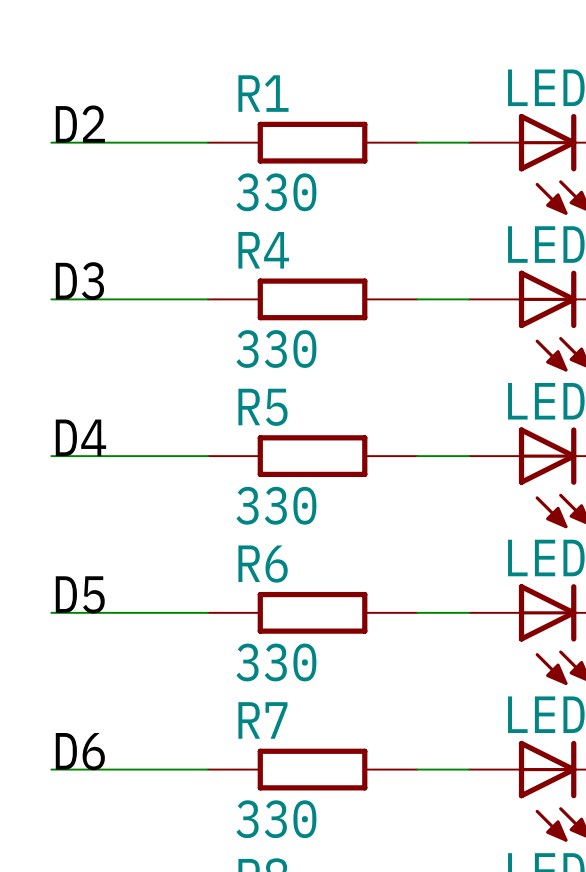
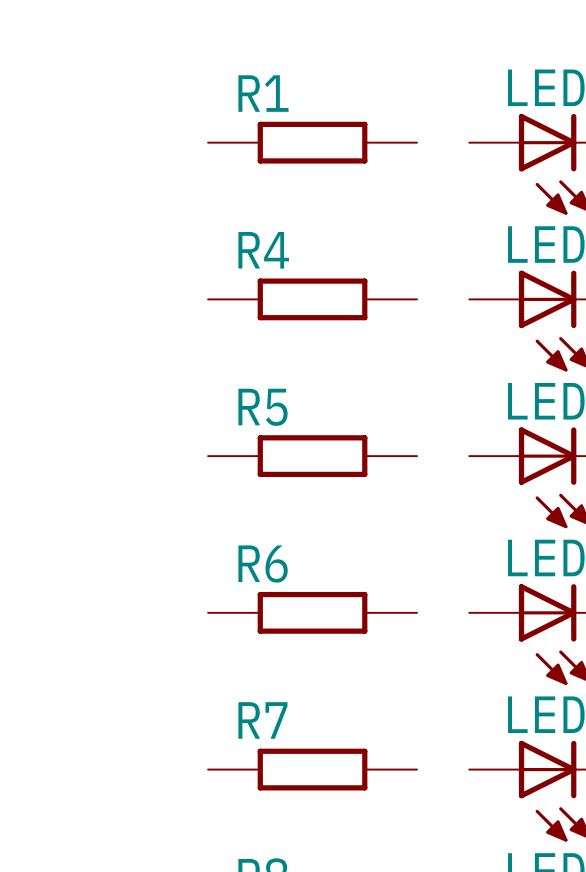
label: D2 (80, 124) -> none
wire: (51, 142) (208, 142) -> none
wire: (417, 142) (469, 142) -> none
R1 value: 330 (276, 192) -> none
label: D3 (79, 281) -> none
wire: (51, 299) (208, 299) -> none
wire: (417, 299) (469, 299) -> none
R4 value: 330 (276, 349) -> none
label: D4 (80, 437) -> none
wire: (51, 456) (208, 456) -> none
wire: (417, 456) (469, 456) -> none
R5 value: 330 (276, 505) -> none
label: D5 (80, 594) -> none
wire: (51, 612) (208, 612) -> none
wire: (417, 612) (469, 612) -> none
R6 value: 330 (276, 662) -> none
label: D6 (80, 751) -> none
wire: (51, 769) (208, 769) -> none
wire: (417, 769) (469, 769) -> none
R7 value: 330 (276, 819) -> none

